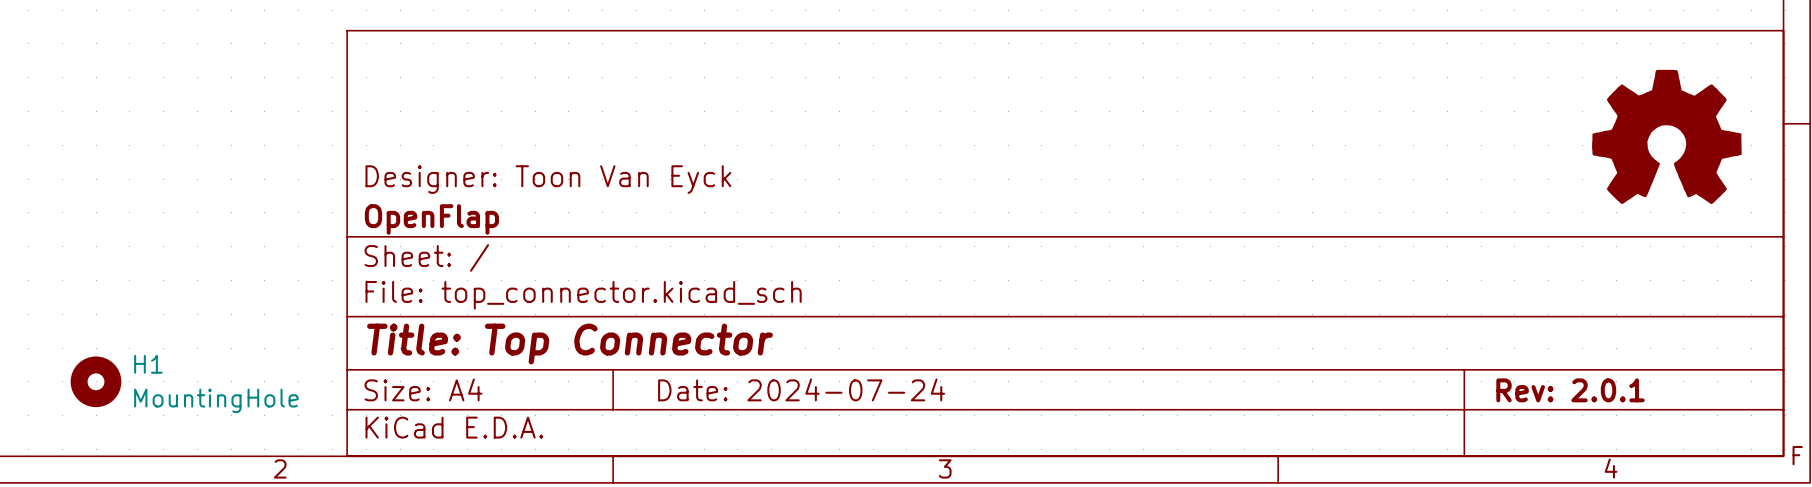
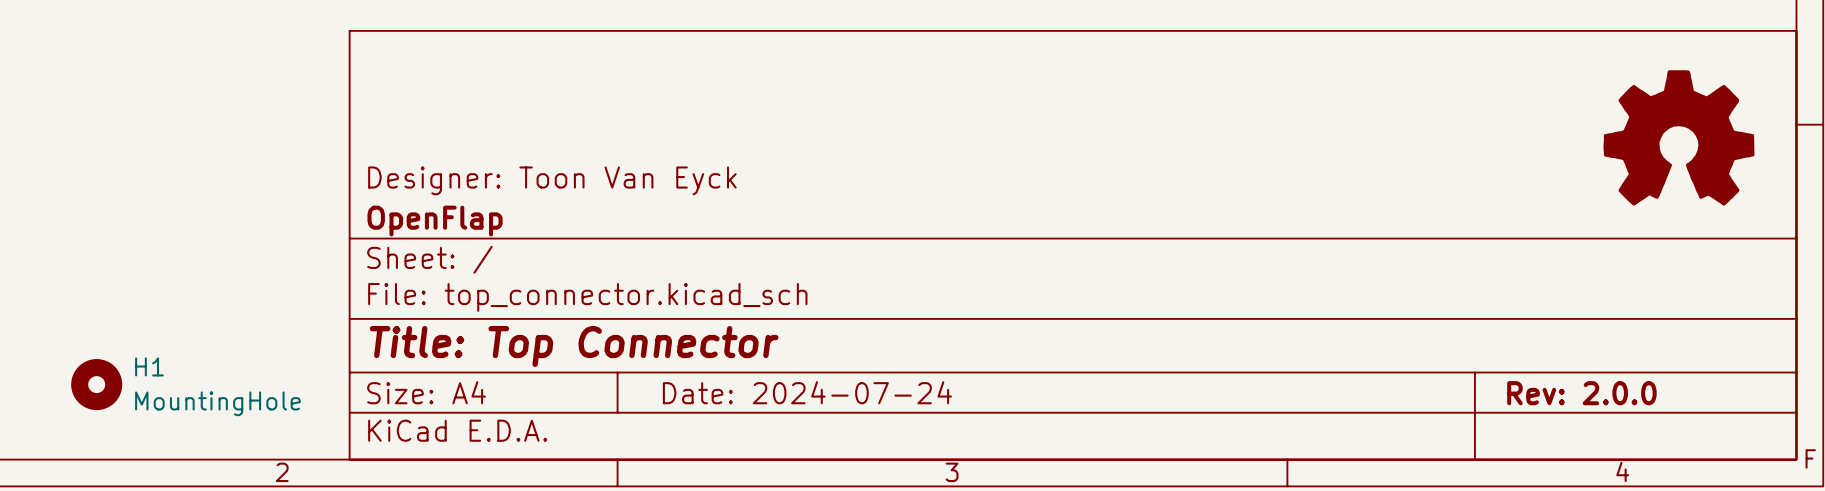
title block: Rev: 2.0.1 (1570, 390) -> Rev: 2.0.0 (1581, 393)

